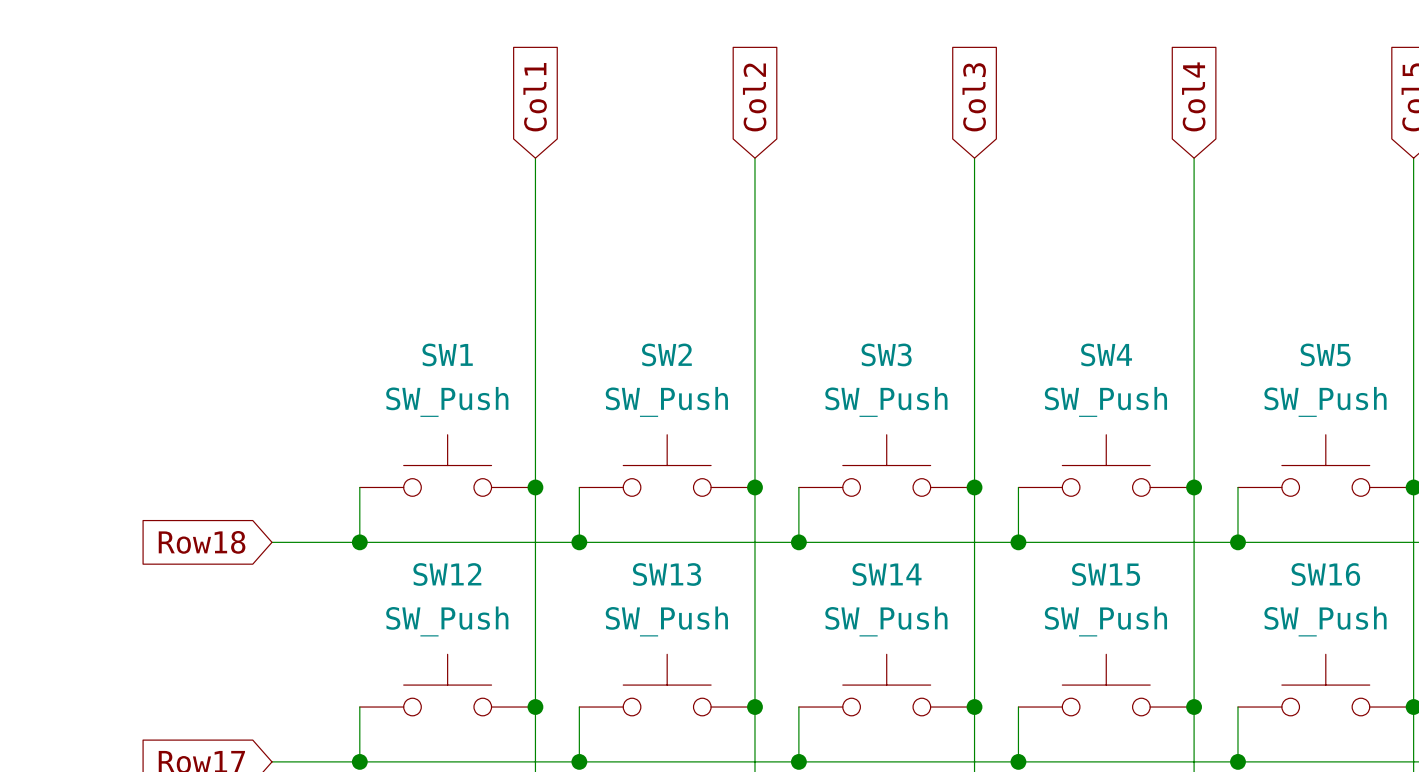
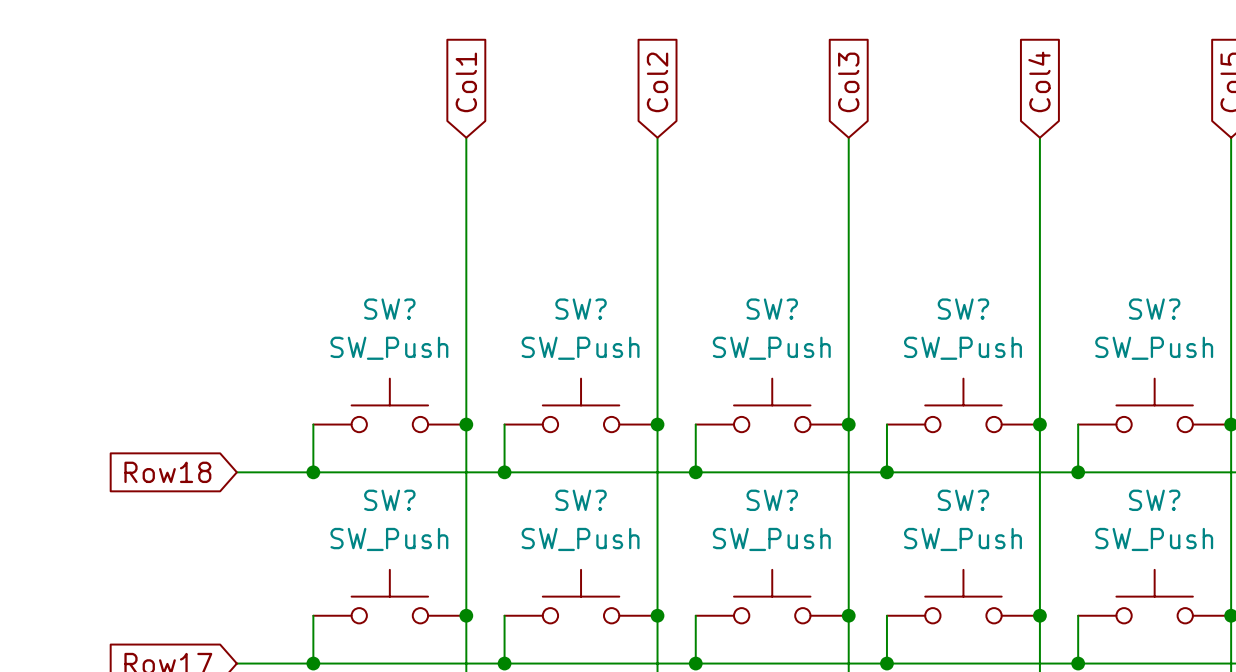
SW1 name: SW1 (447, 354) -> SW? (389, 309)
SW2 name: SW2 (666, 354) -> SW? (581, 309)
SW3 name: SW3 (886, 354) -> SW? (772, 309)
SW4 name: SW4 (1106, 354) -> SW? (963, 309)
SW5 name: SW5 (1325, 354) -> SW? (1154, 309)
SW12 name: SW12 (447, 574) -> SW? (389, 500)
SW13 name: SW13 (667, 574) -> SW? (581, 500)
SW14 name: SW14 (887, 574) -> SW? (772, 500)
SW15 name: SW15 (1106, 574) -> SW? (963, 500)
SW16 name: SW16 (1325, 574) -> SW? (1154, 500)

